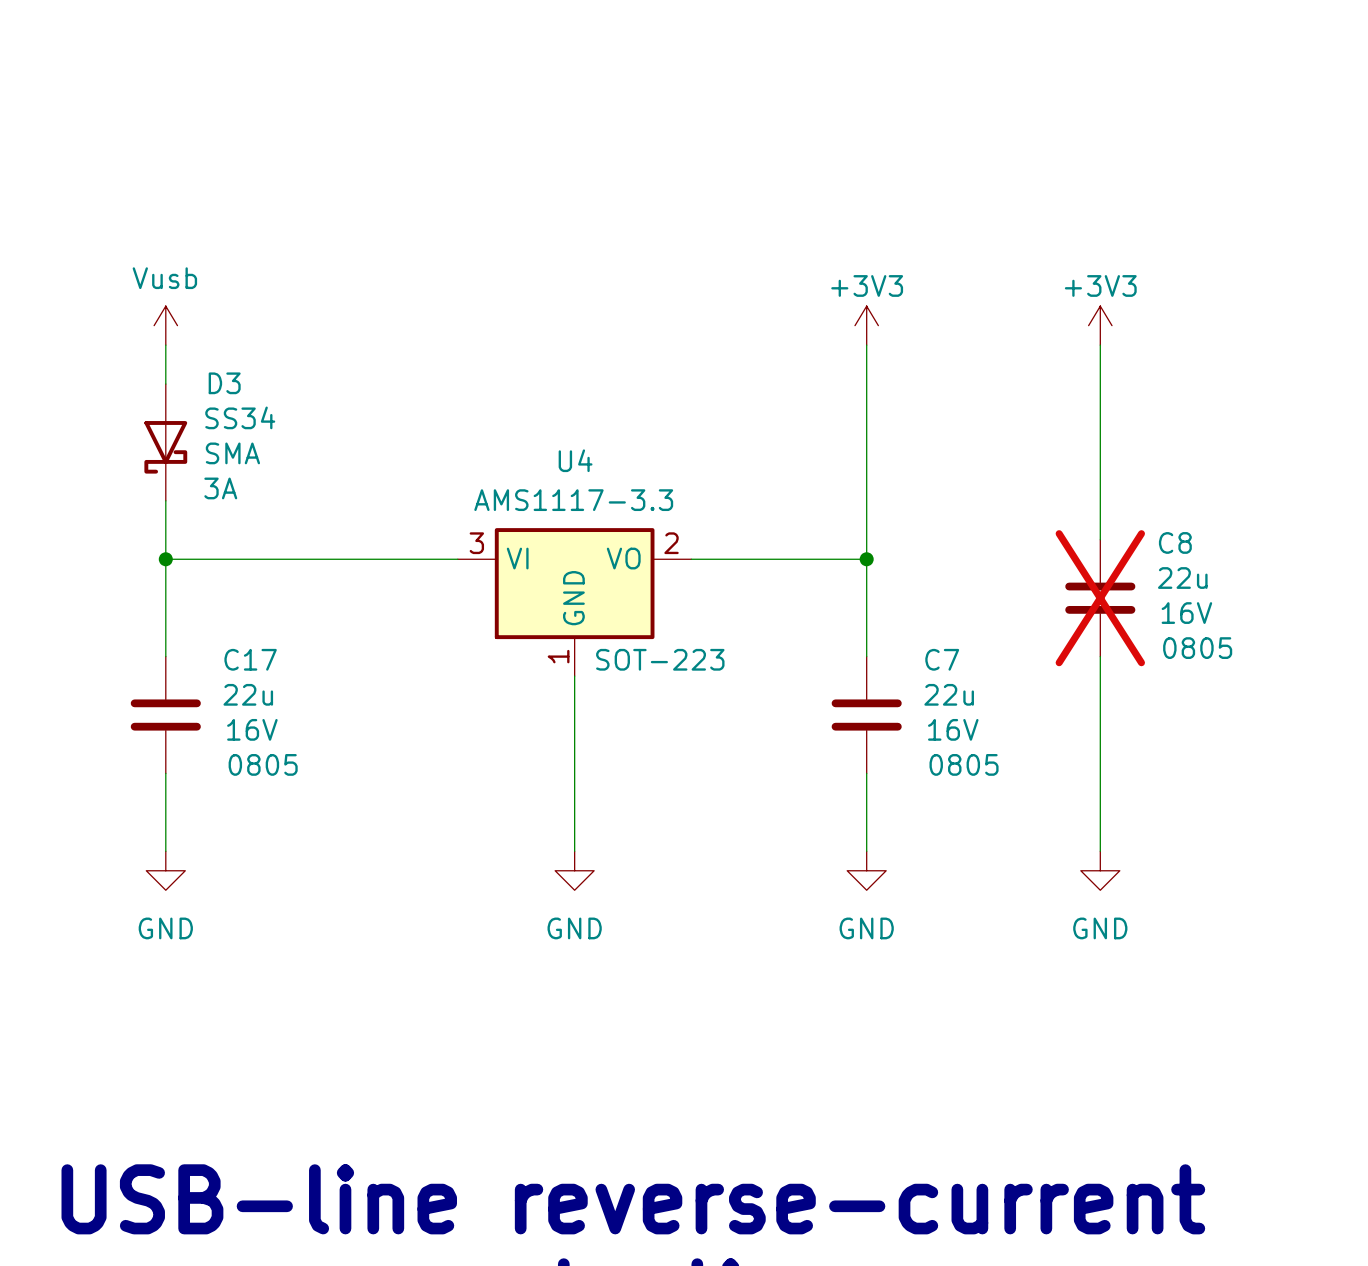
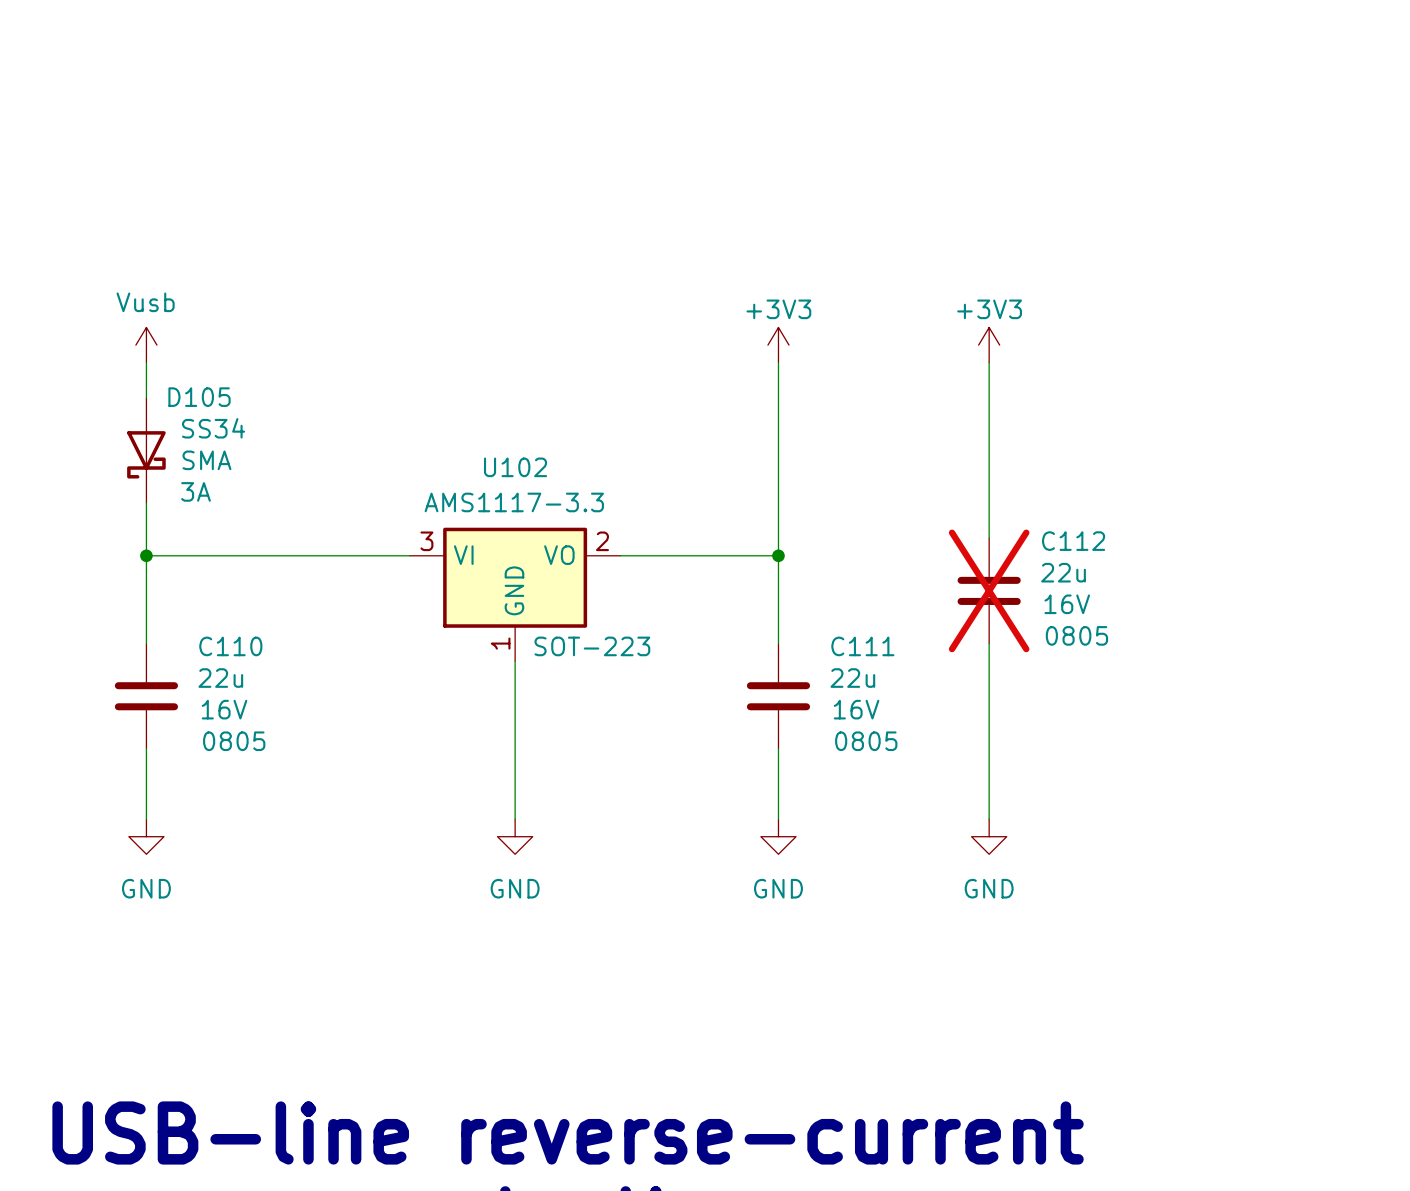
D3 name: D3 (224, 383) -> D105 (199, 397)
U4 name: U4 (575, 460) -> U102 (515, 467)
C8 name: C8 (1175, 542) -> C112 (1073, 541)
C17 name: C17 (250, 659) -> C110 (230, 646)
C7 name: C7 (942, 659) -> C111 (862, 646)

